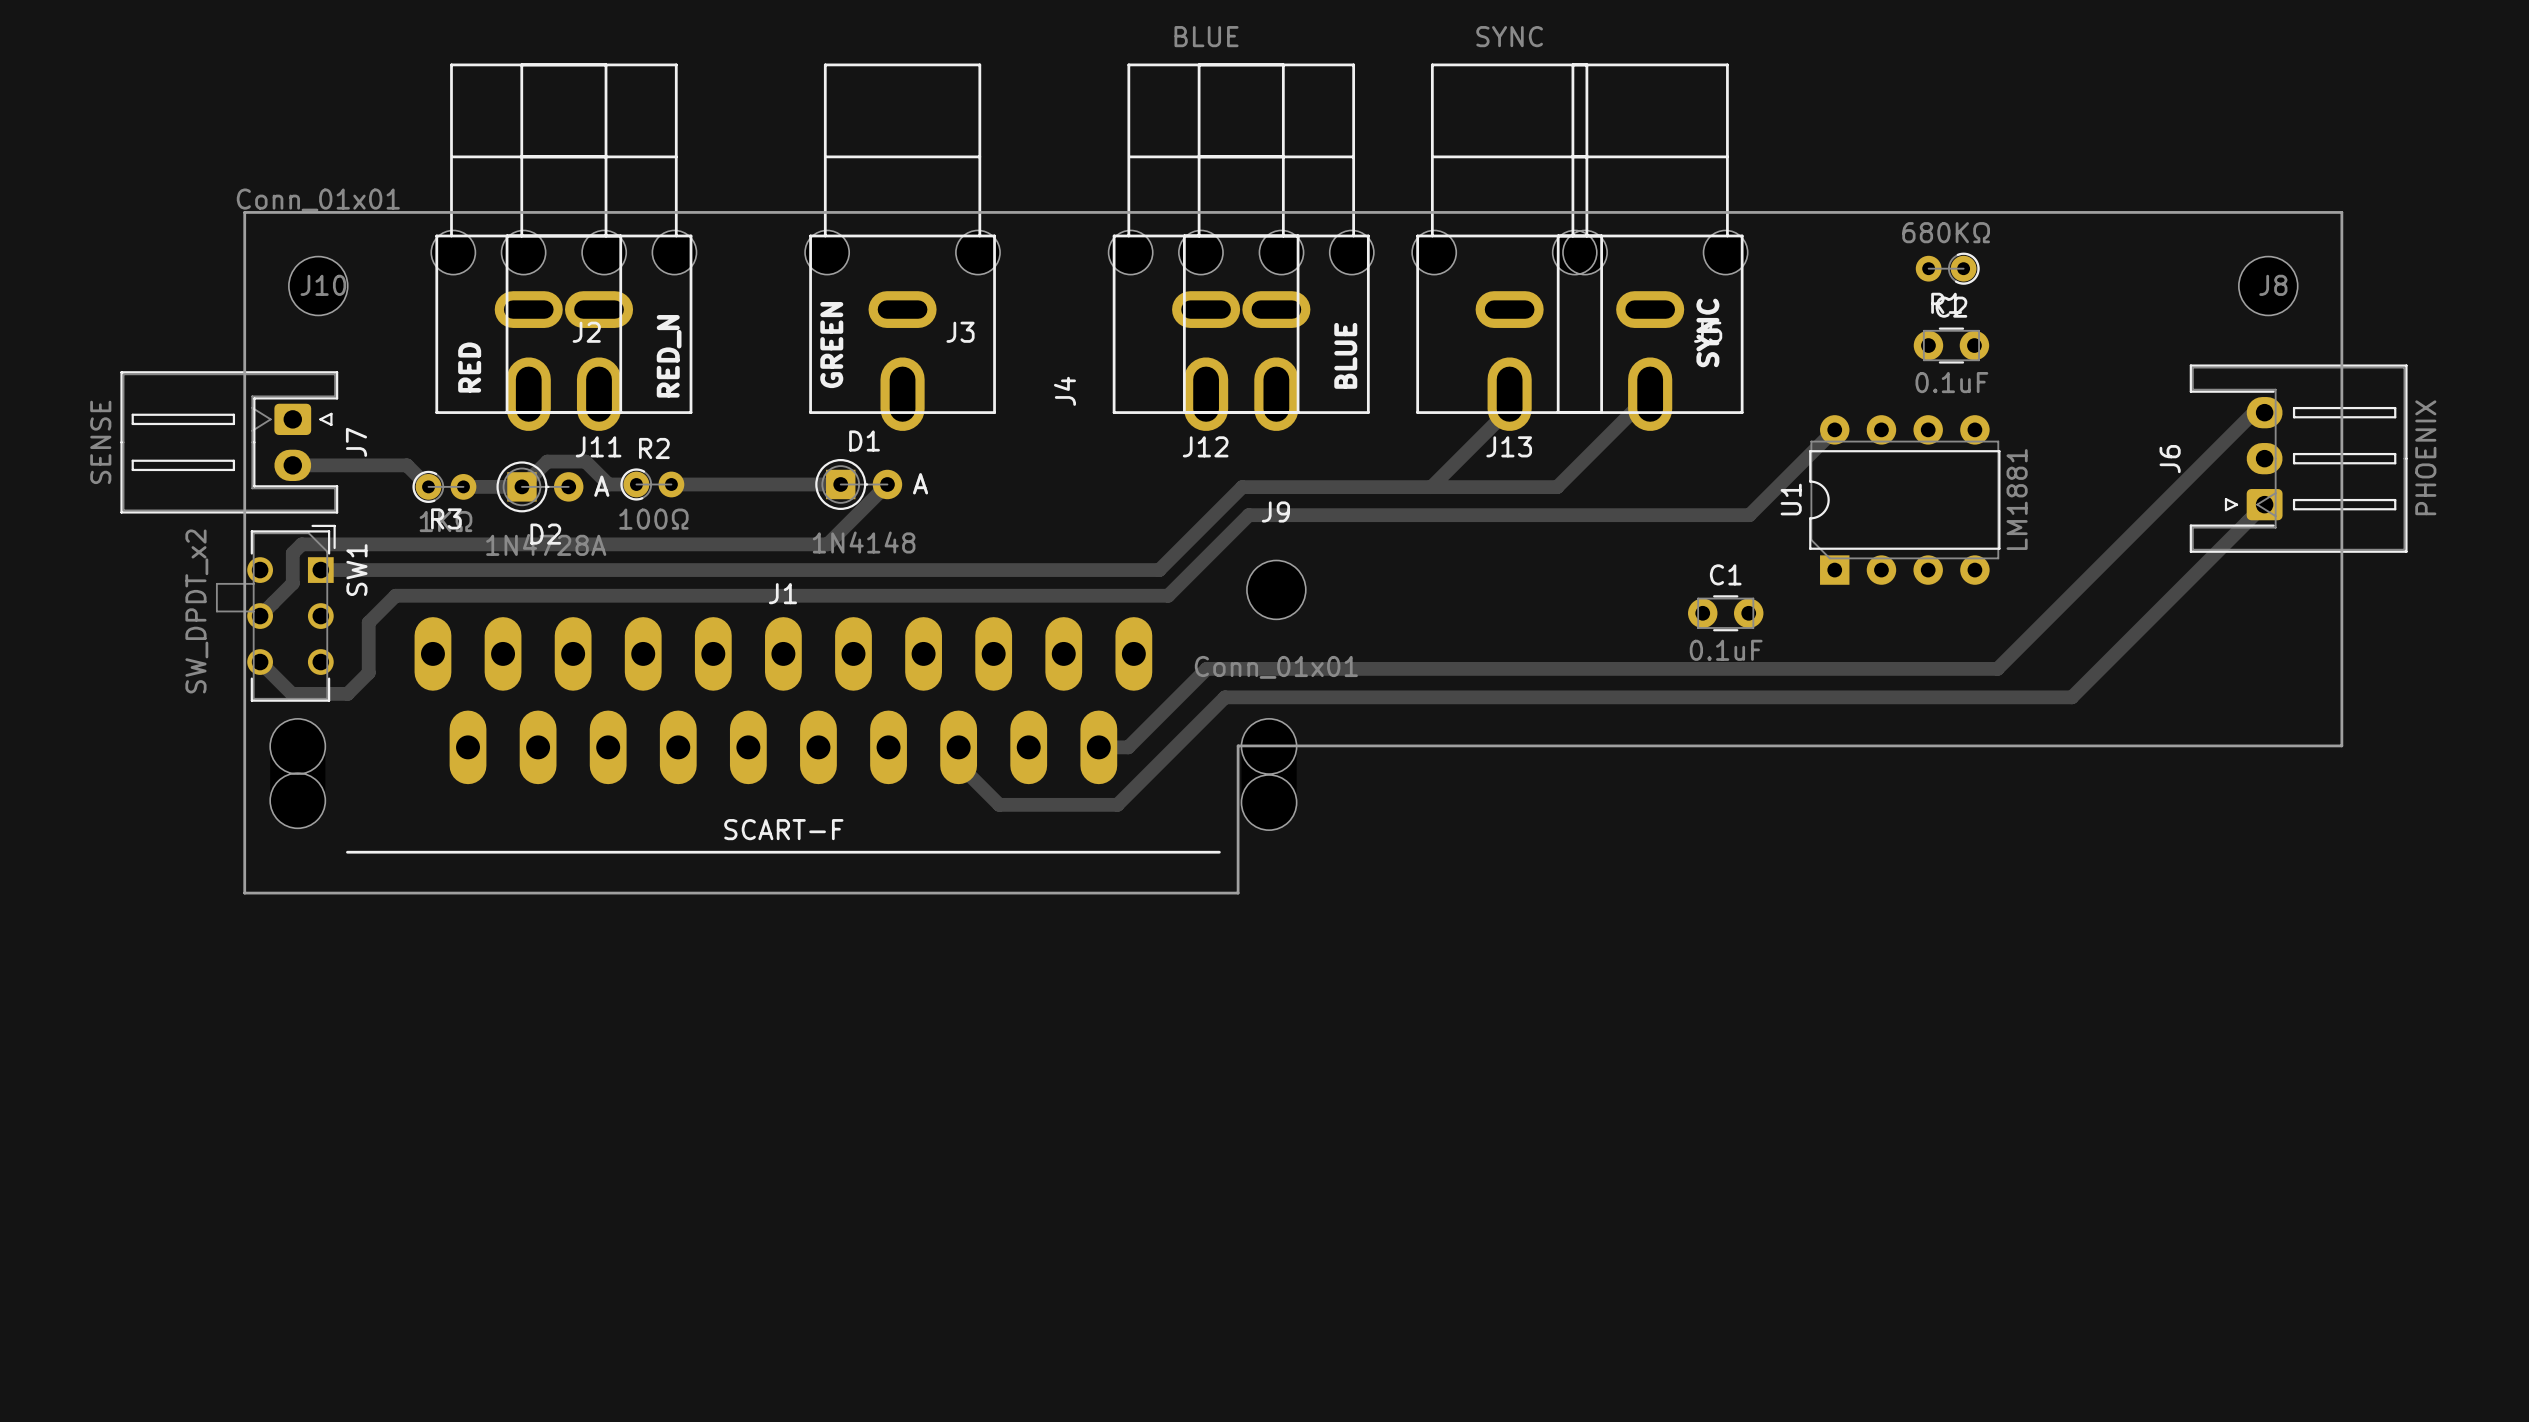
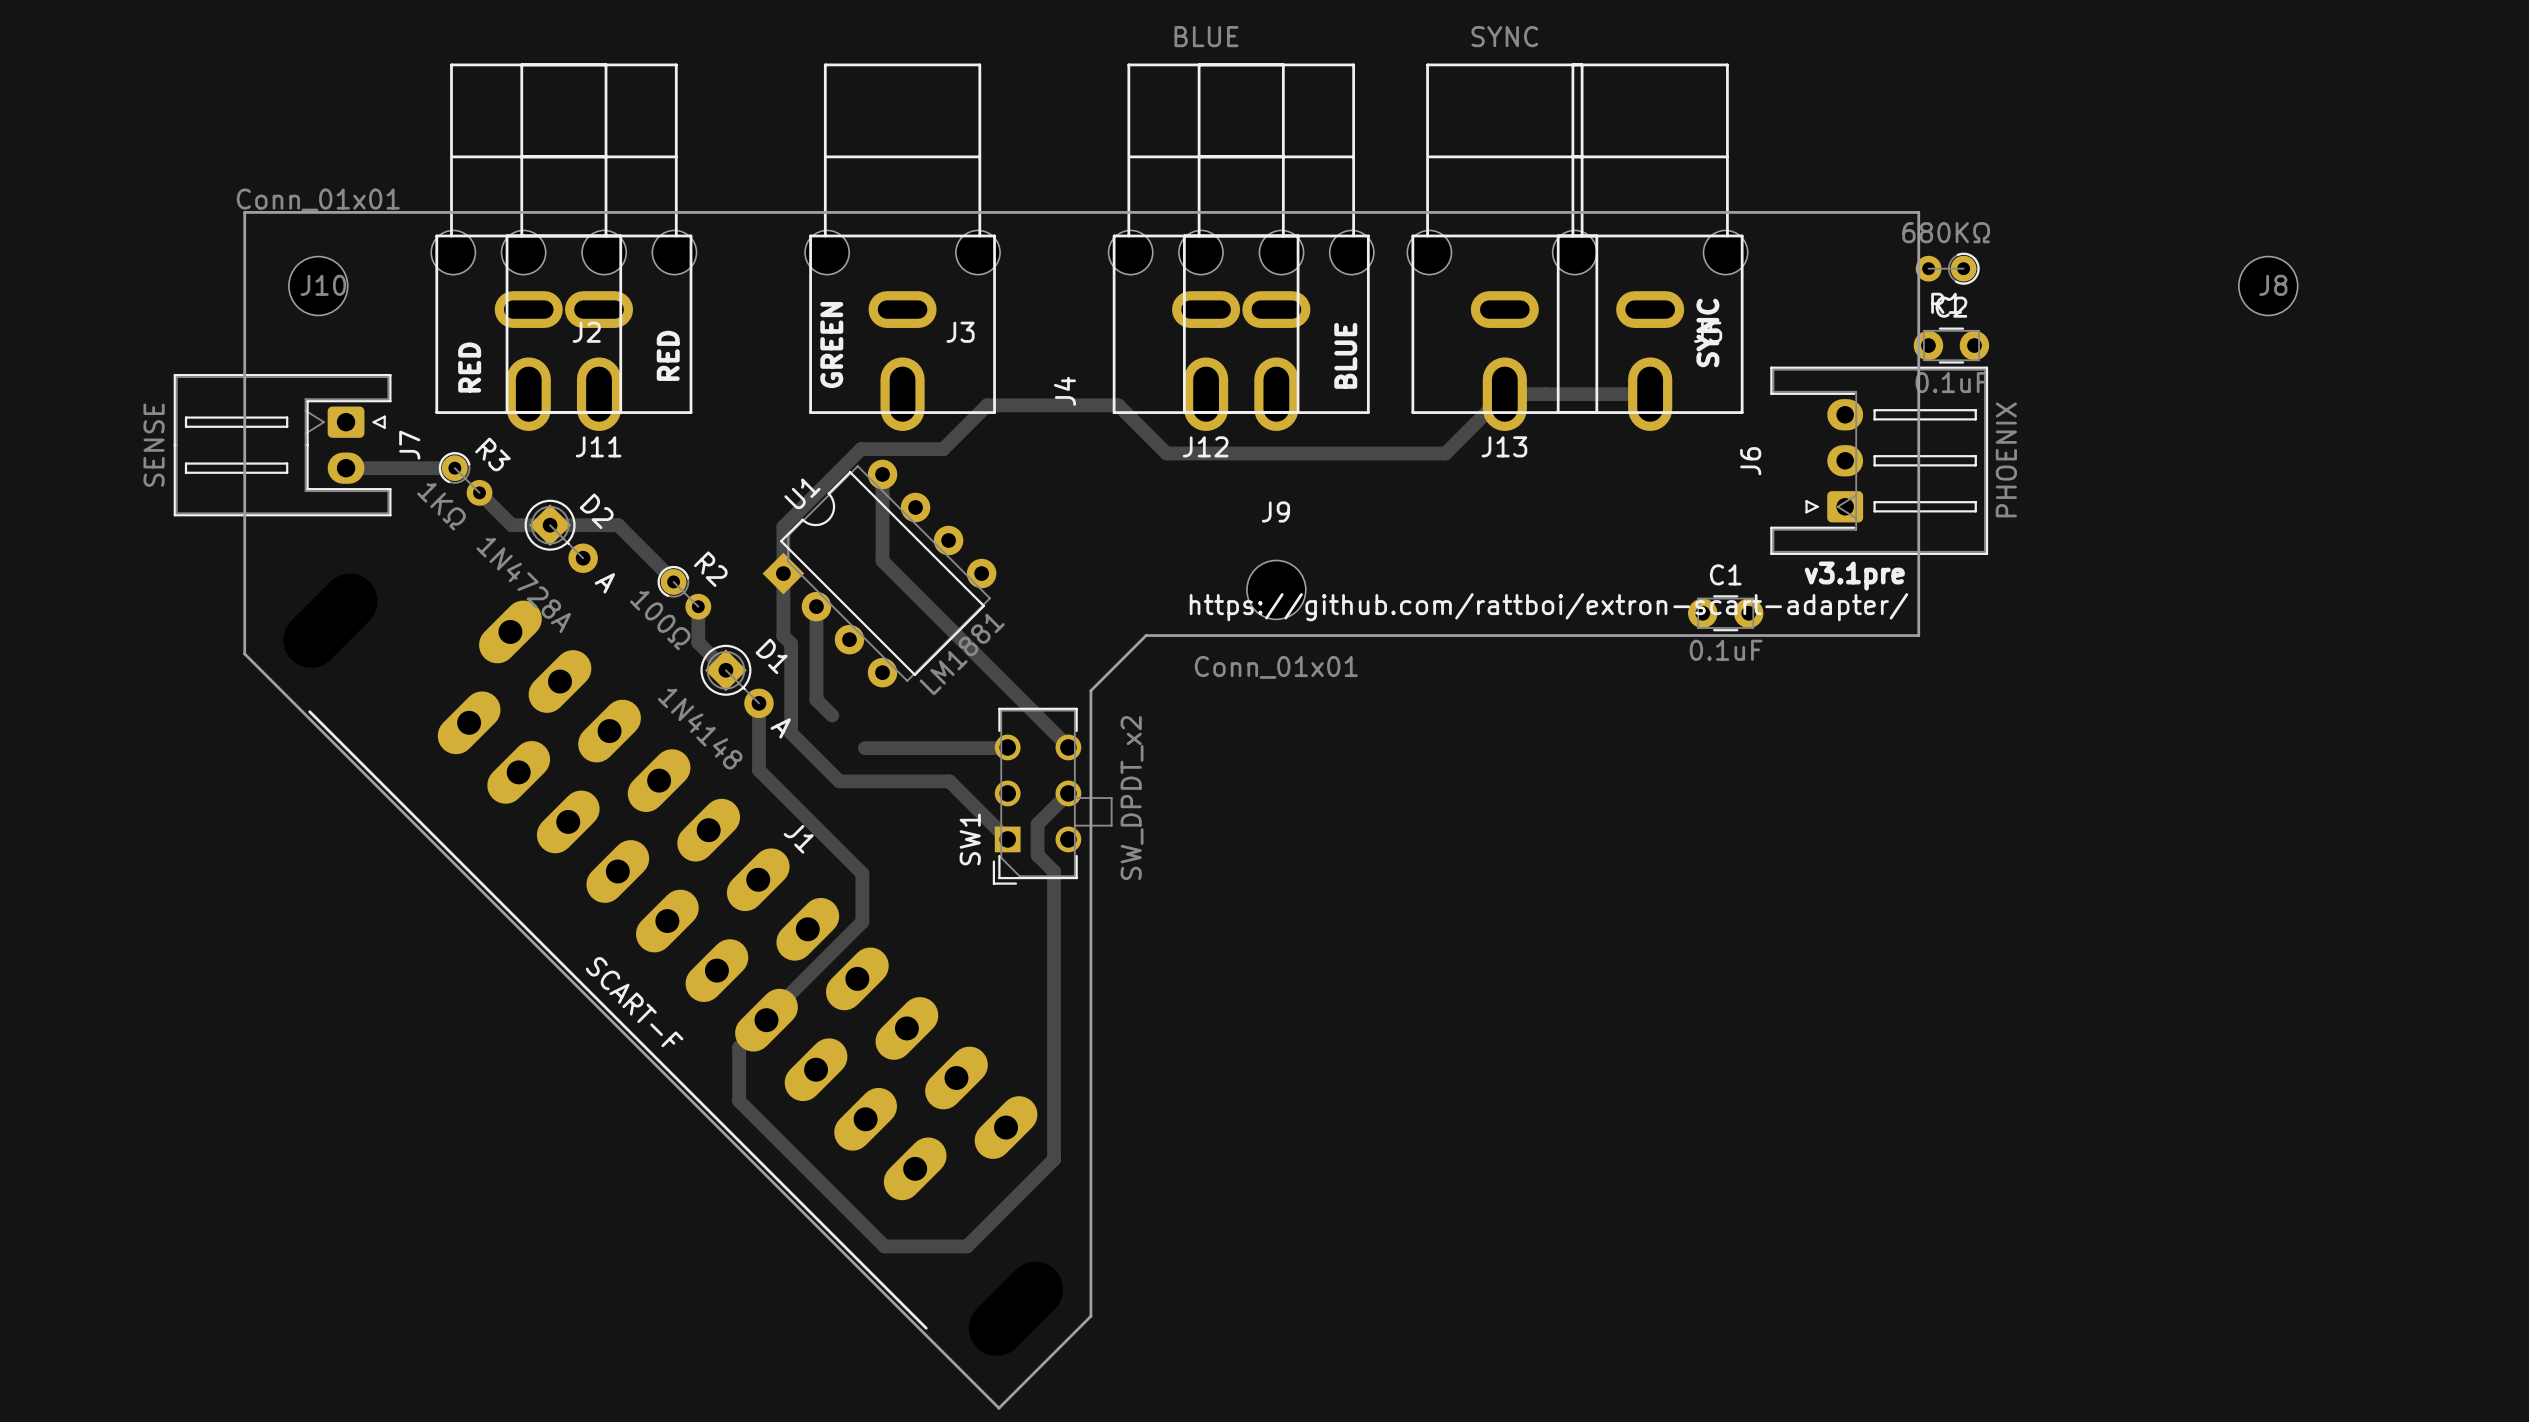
J13 footprint: [1412, 63, 1608, 431] -> [1407, 63, 1599, 431]
board edge: (1918, 212) (2341, 212) (2341, 745) (1238, 745) (1238, 893) (244, 893) (244, 653) -> (1918, 212) (1918, 635) (1146, 635) (1090, 690) (1090, 1316) (998, 1408) (244, 653)
J11 value: RED_N (669, 356) -> RED (668, 355)
track: (1650, 394) (1557, 487) (1242, 487) (1159, 570) (320, 570) -> (1650, 394) (1504, 394) (1445, 453) (1166, 453) (1118, 405) (987, 405) (943, 449) (861, 449) (783, 526) (783, 636) (791, 643) (791, 733) (839, 781) (949, 781) (1007, 839)
track: (1509, 408) (1431, 487) -> none
track: (2264, 412) (2253, 412) (1997, 668) (1206, 668) (1128, 747) (1098, 747) -> none
track: (1831, 429) (1834, 429) (1749, 515) (1248, 515) (1168, 595) (395, 595) (368, 622) (368, 672) (347, 693) (291, 693) (260, 662) -> none
J7 position: (229, 442) -> (282, 445)
J6 position: (2298, 458) -> (1879, 460)
track: (292, 465) (406, 465) (428, 486) -> none
track: none -> (346, 468) (454, 468)
track: none -> (882, 474) (882, 560) (1067, 746)
track: (636, 484) (608, 484) (585, 461) (547, 461) (521, 486) (463, 486) -> none
R2 rotation: 0° (652, 484) -> 45° clockwise (684, 592)
R2 position: (652, 484) -> (684, 592)
track: (671, 484) (840, 484) -> none
D1 rotation: 0° (858, 484) -> 45° clockwise (737, 681)
D1 position: (858, 484) -> (737, 681)
track: (887, 484) (827, 544) (301, 544) (292, 553) (292, 583) (260, 616) -> none
R3 rotation: 0° (444, 486) -> 45° clockwise (465, 478)
D2 rotation: 0° (539, 486) -> 45° clockwise (561, 536)
D2 position: (539, 486) -> (561, 536)
track: none -> (479, 492) (511, 525) (618, 525) (673, 581)
U1 rotation: 0° (1904, 499) -> 45° clockwise (879, 573)
U1 position: (1904, 499) -> (879, 573)
track: (2264, 504) (2071, 697) (1225, 697) (1117, 804) (999, 804) (958, 764) (958, 747) -> none
R3 name position: R3 (446, 518) -> R3 (492, 454)
D2 name position: D2 (545, 534) -> D2 (596, 511)
text: none -> v3.1pre (1854, 576)
J1 name position: J1 (782, 593) -> J1 (798, 839)
track: none -> (698, 606) (698, 642) (725, 670)
track: none -> (816, 606) (816, 699) (832, 715)
text: none -> https://github.com/rattboi/extron-scart-adapter/ (1548, 607)
SW1 rotation: 0° (275, 613) -> 180° (1052, 796)
SW1 position: (275, 613) -> (1052, 796)
J1 footprint: [270, 617, 1297, 854] -> [283, 573, 1064, 1356]
track: none -> (758, 703) (758, 770) (862, 873) (862, 921) (739, 1047) (739, 1101) (884, 1246) (967, 1246) (1054, 1159) (1054, 871) (1037, 855) (1037, 824) (1068, 793)
track: none -> (864, 748) (1007, 747) (1005, 751)
J1 value position: SCART-F (783, 829) -> SCART-F (634, 1002)

